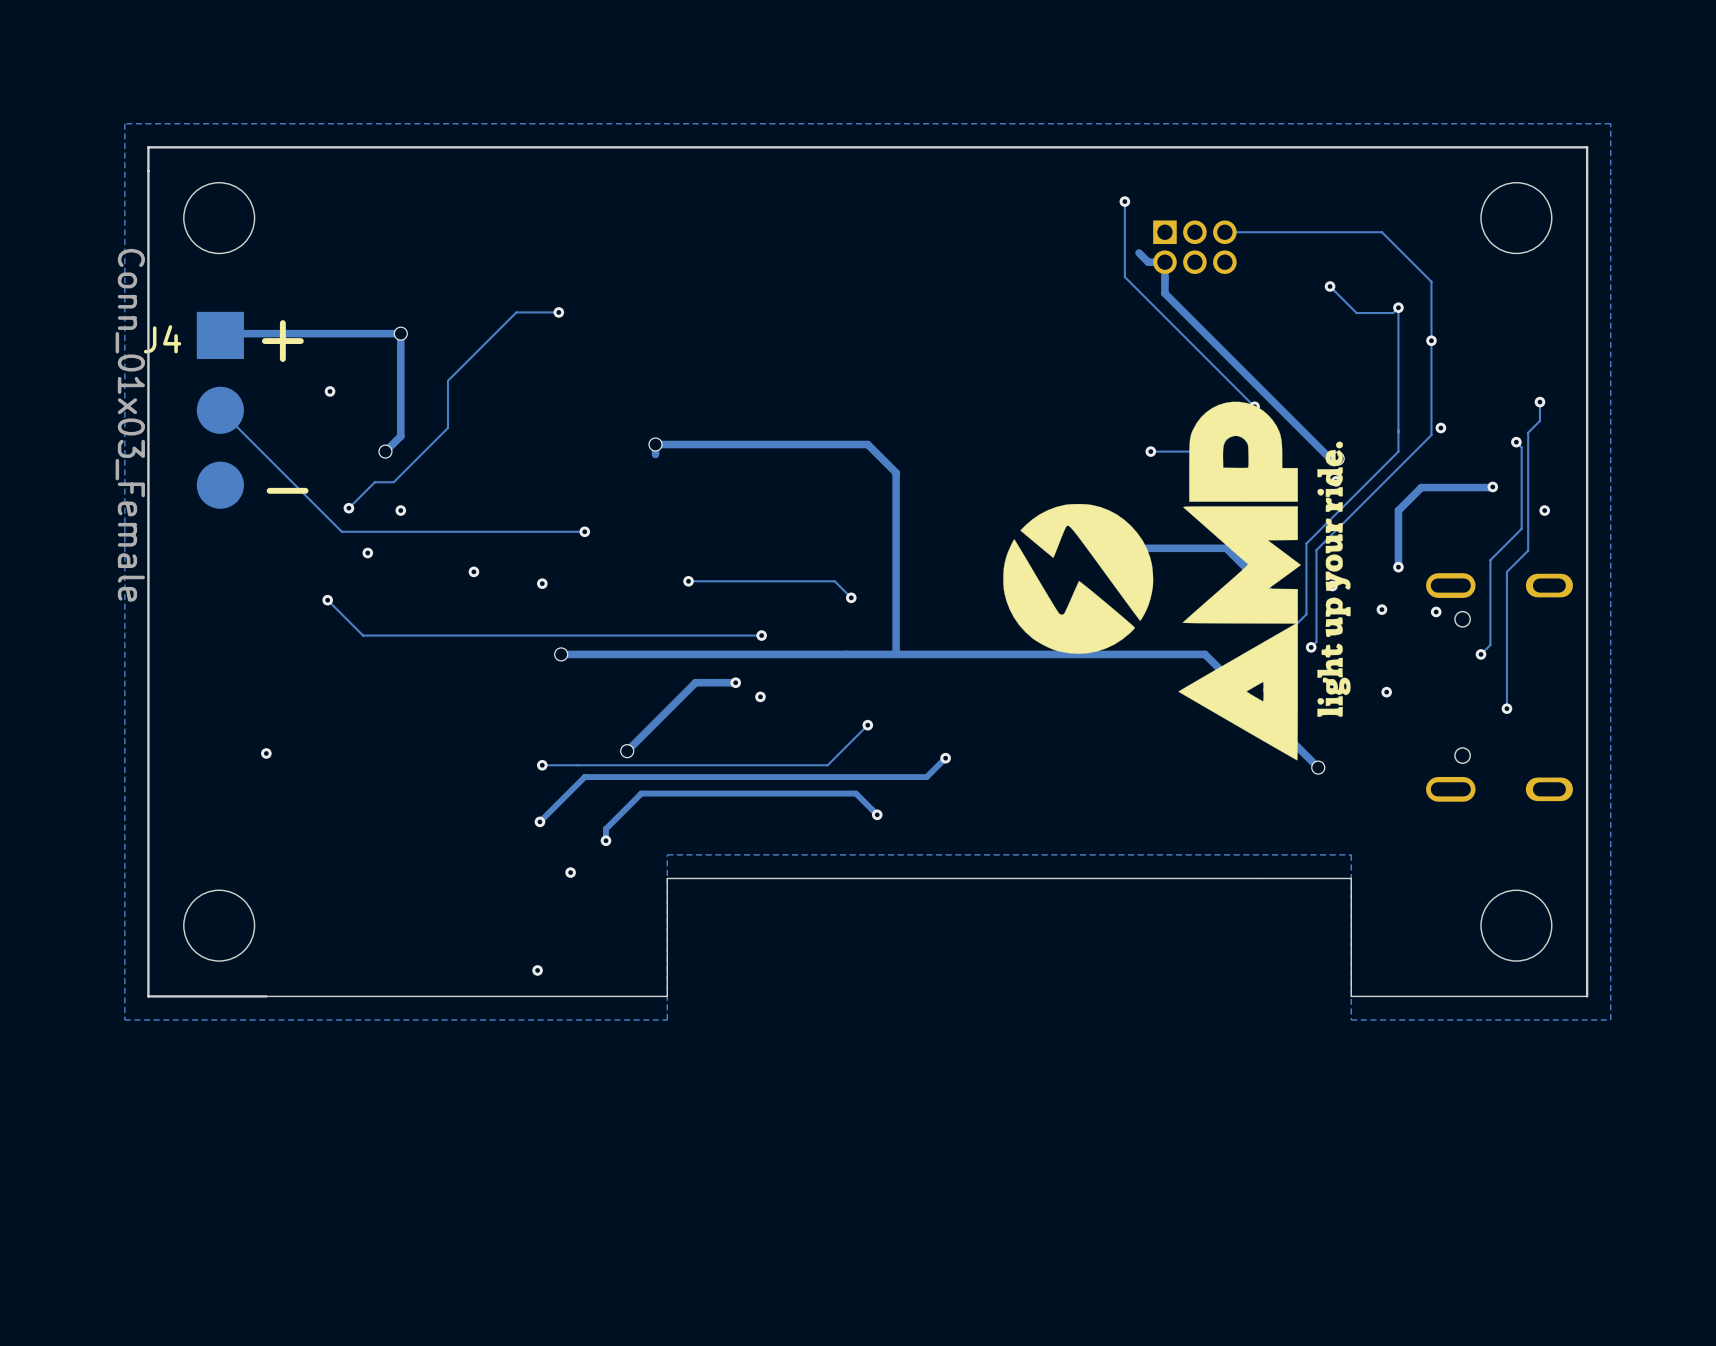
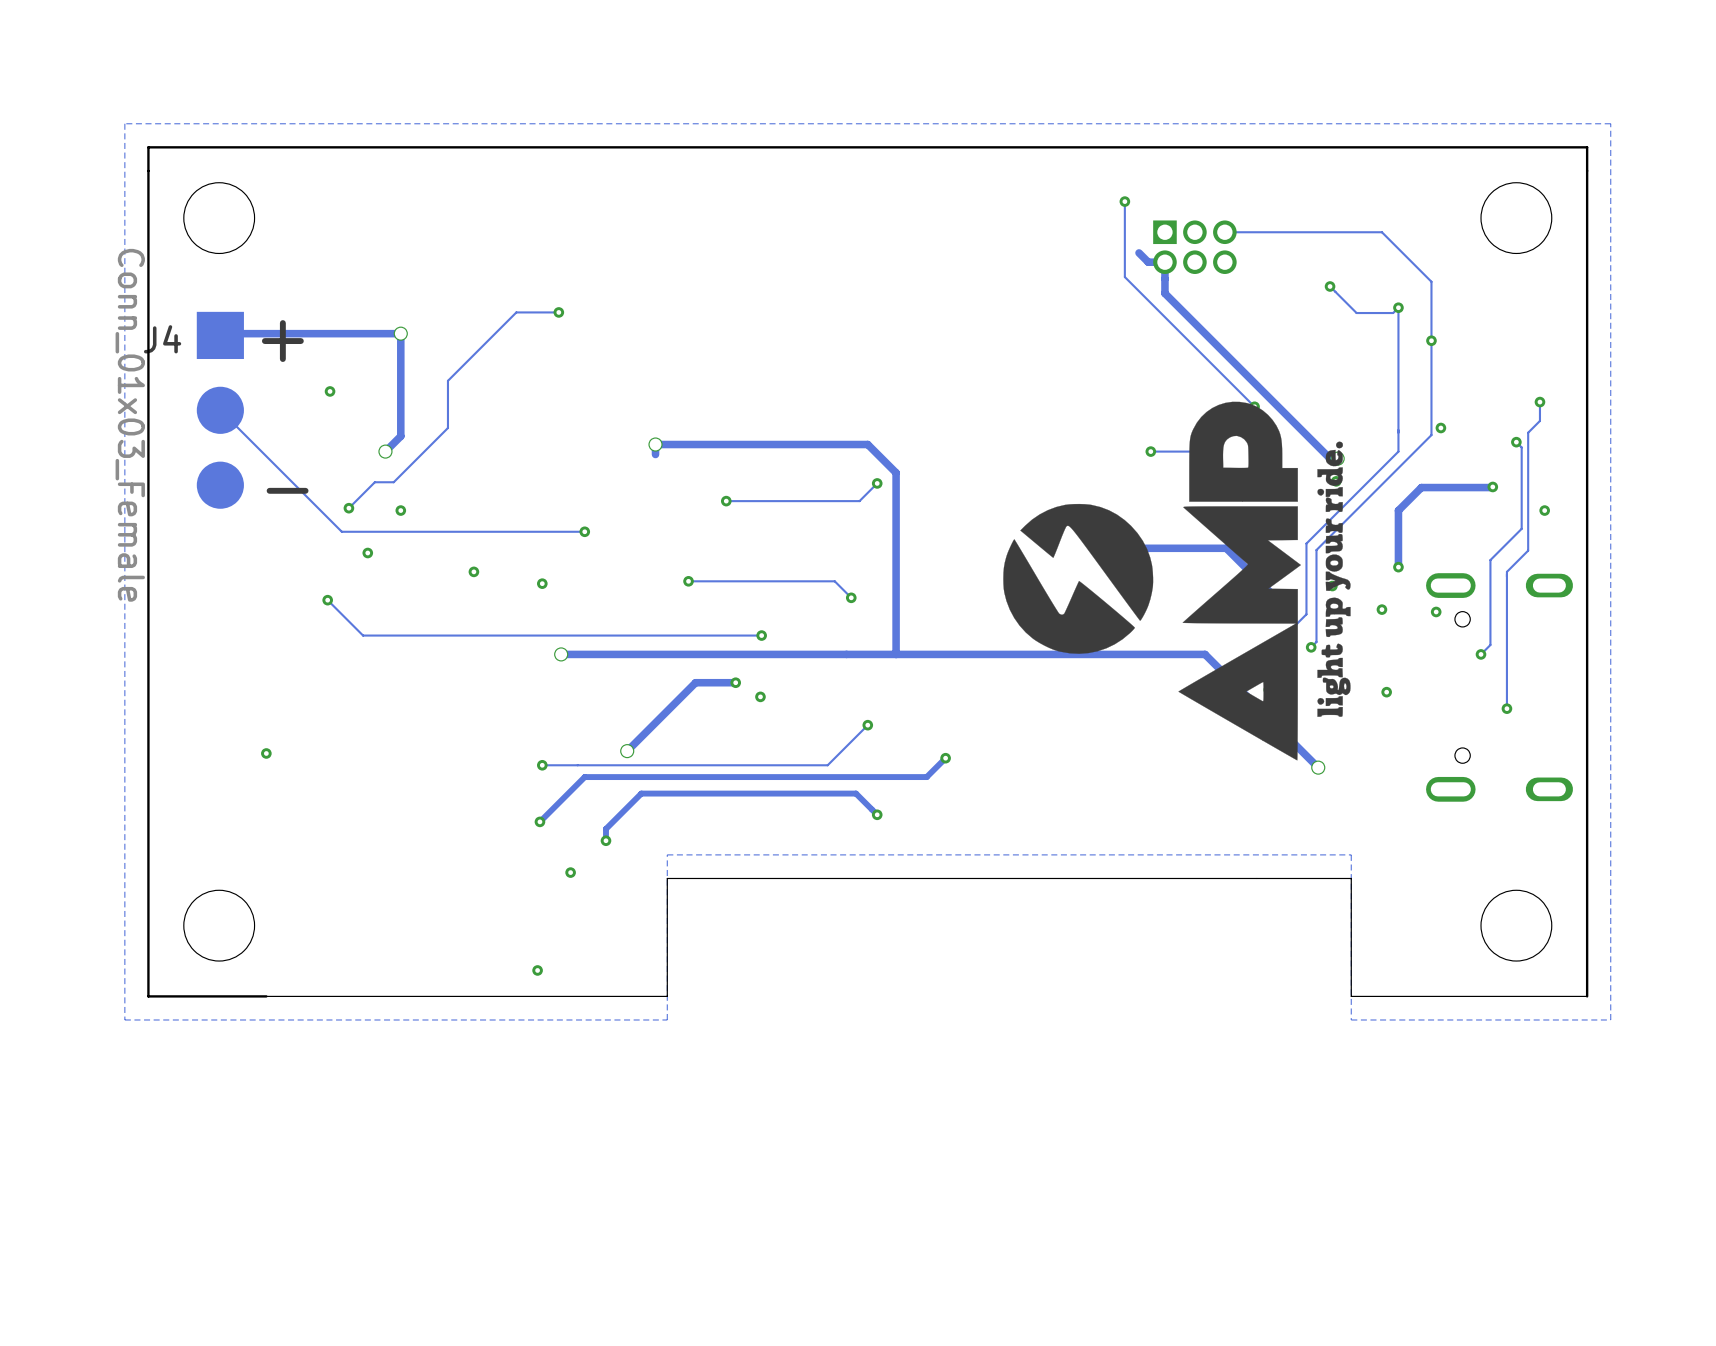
track: none -> (877, 483) (859, 501) (726, 501)
via: none -> (877, 483)
via: none -> (726, 501)

